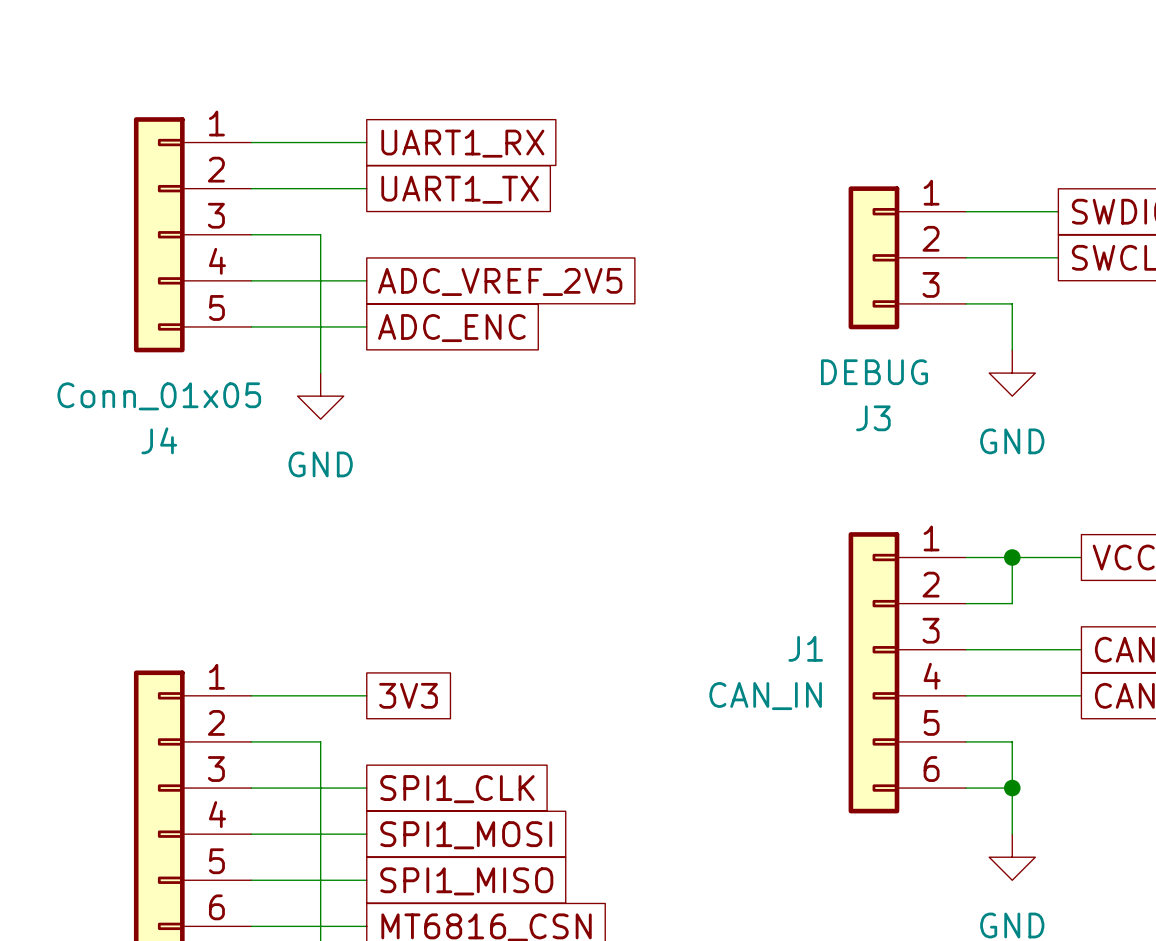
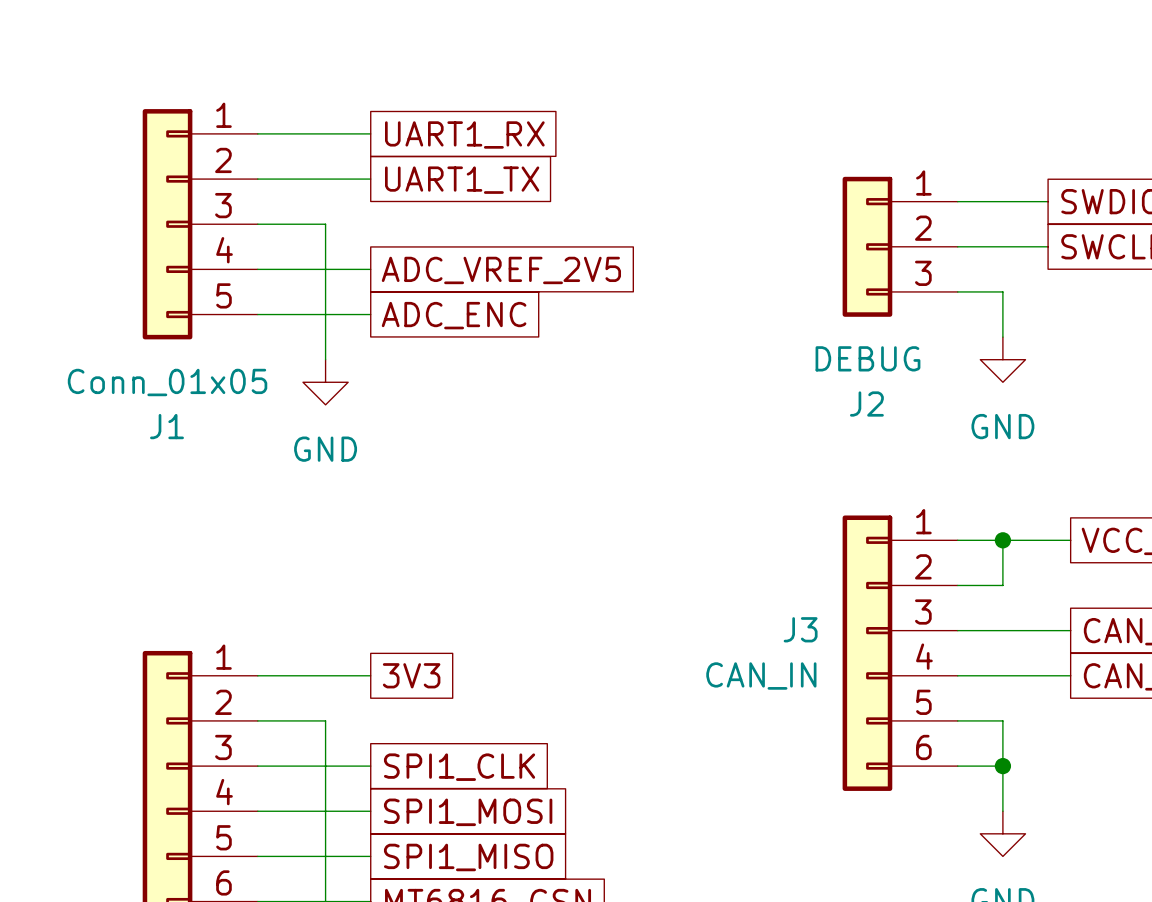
J3 name: J3 (873, 418) -> J2 (866, 404)
J4 name: J4 (159, 440) -> J1 (166, 426)
J1 name: J1 (805, 648) -> J3 (800, 629)

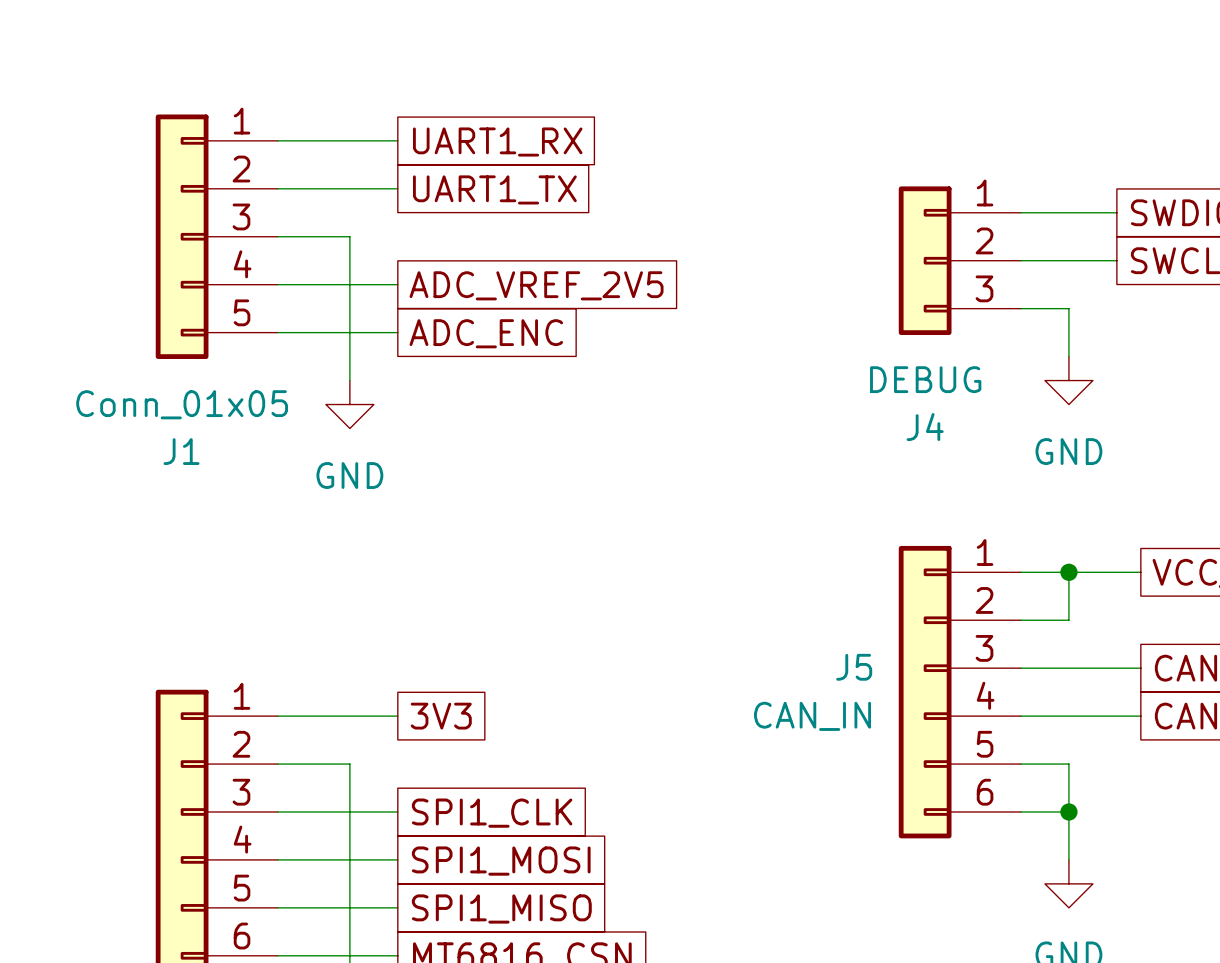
J2 name: J2 (866, 404) -> J4 (925, 427)
J3 name: J3 (800, 629) -> J5 (854, 667)

